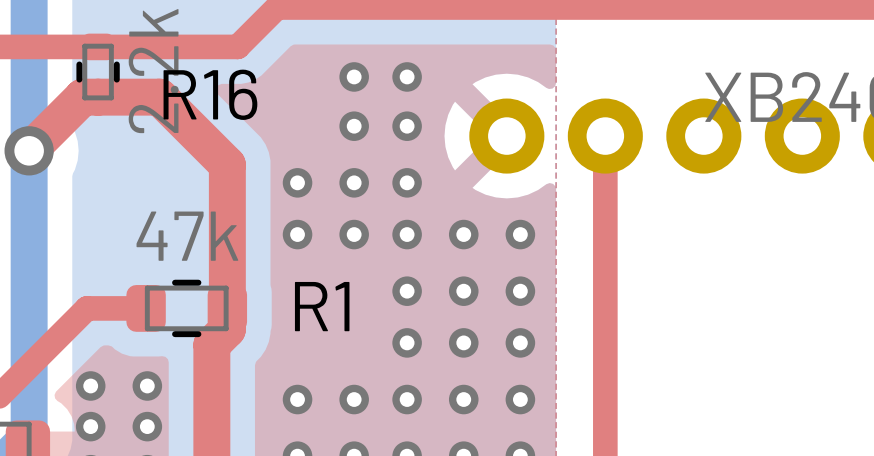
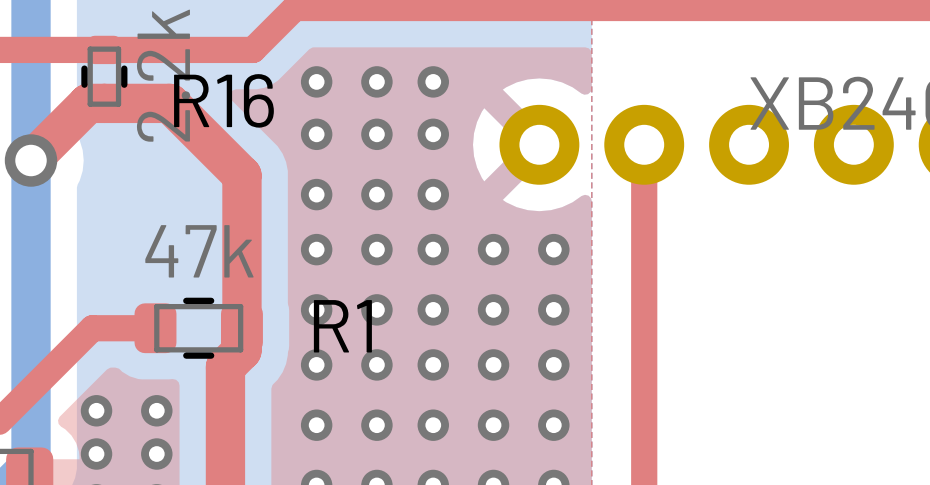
via: none -> (316, 81)
via: none -> (316, 134)
via: none -> (316, 309)
via: none -> (376, 309)
via: none -> (316, 364)
via: none -> (376, 364)

